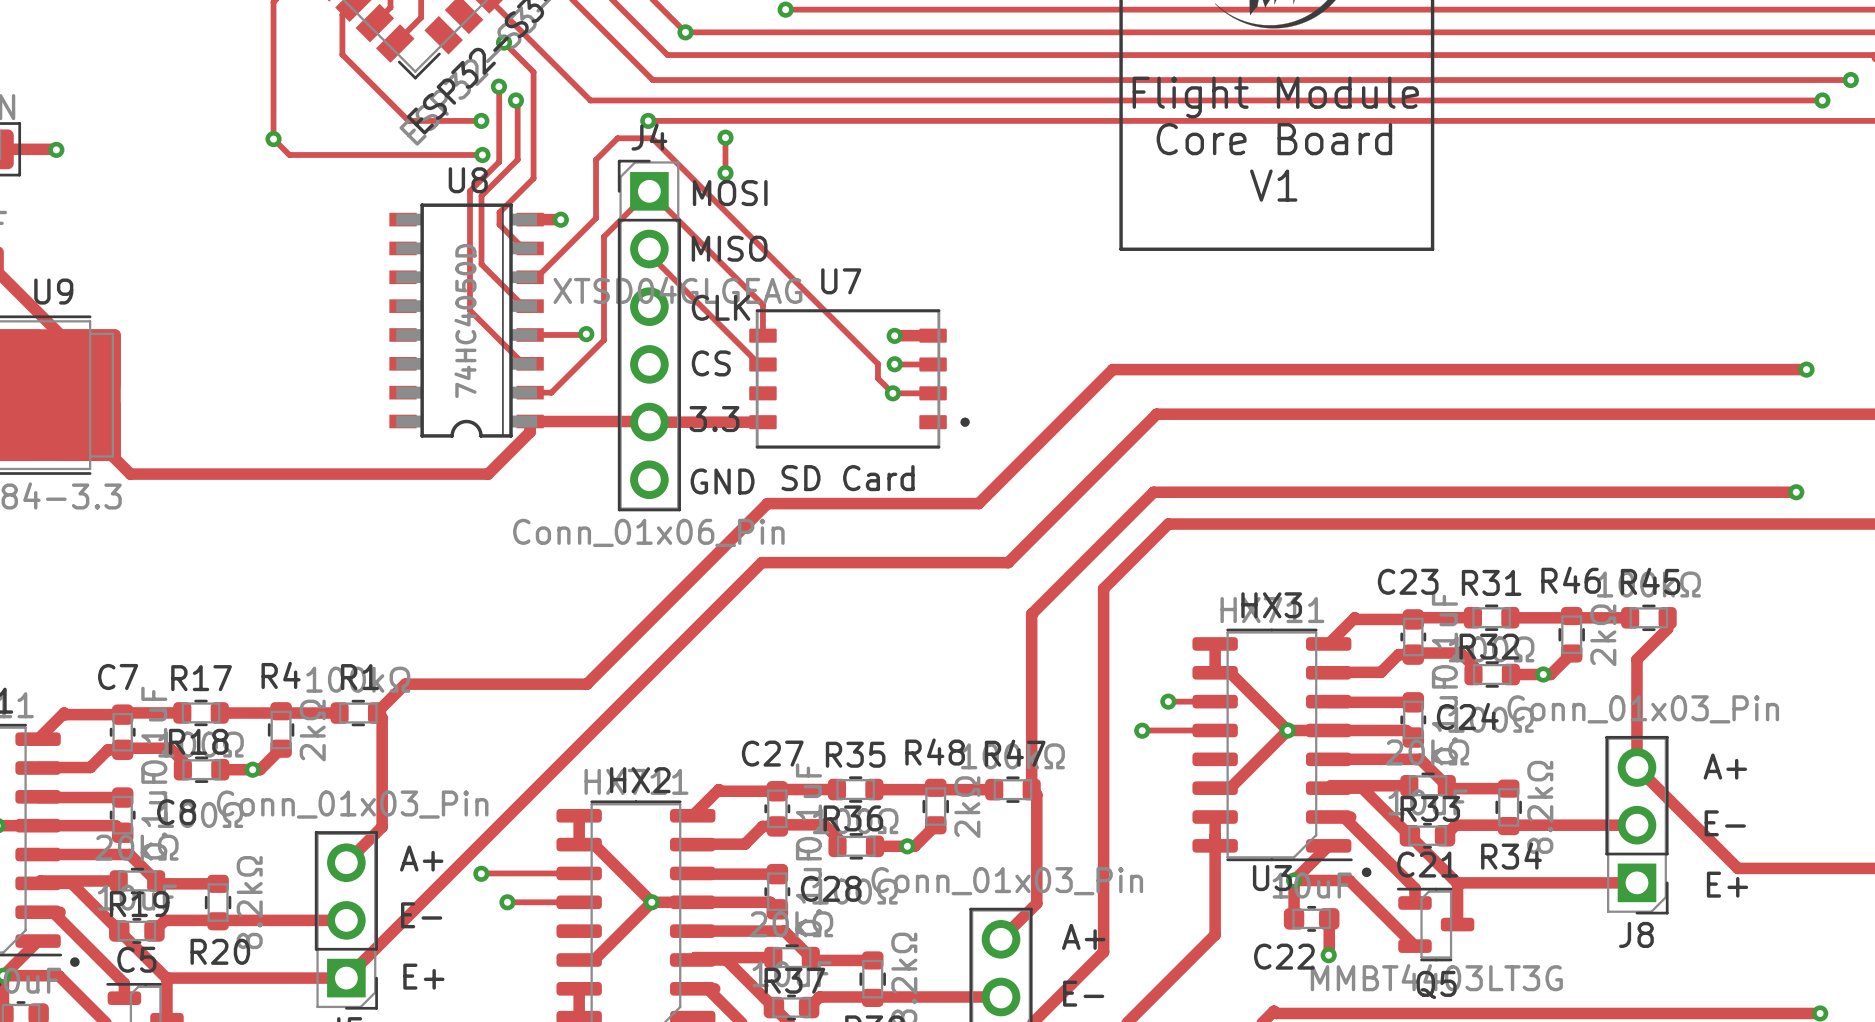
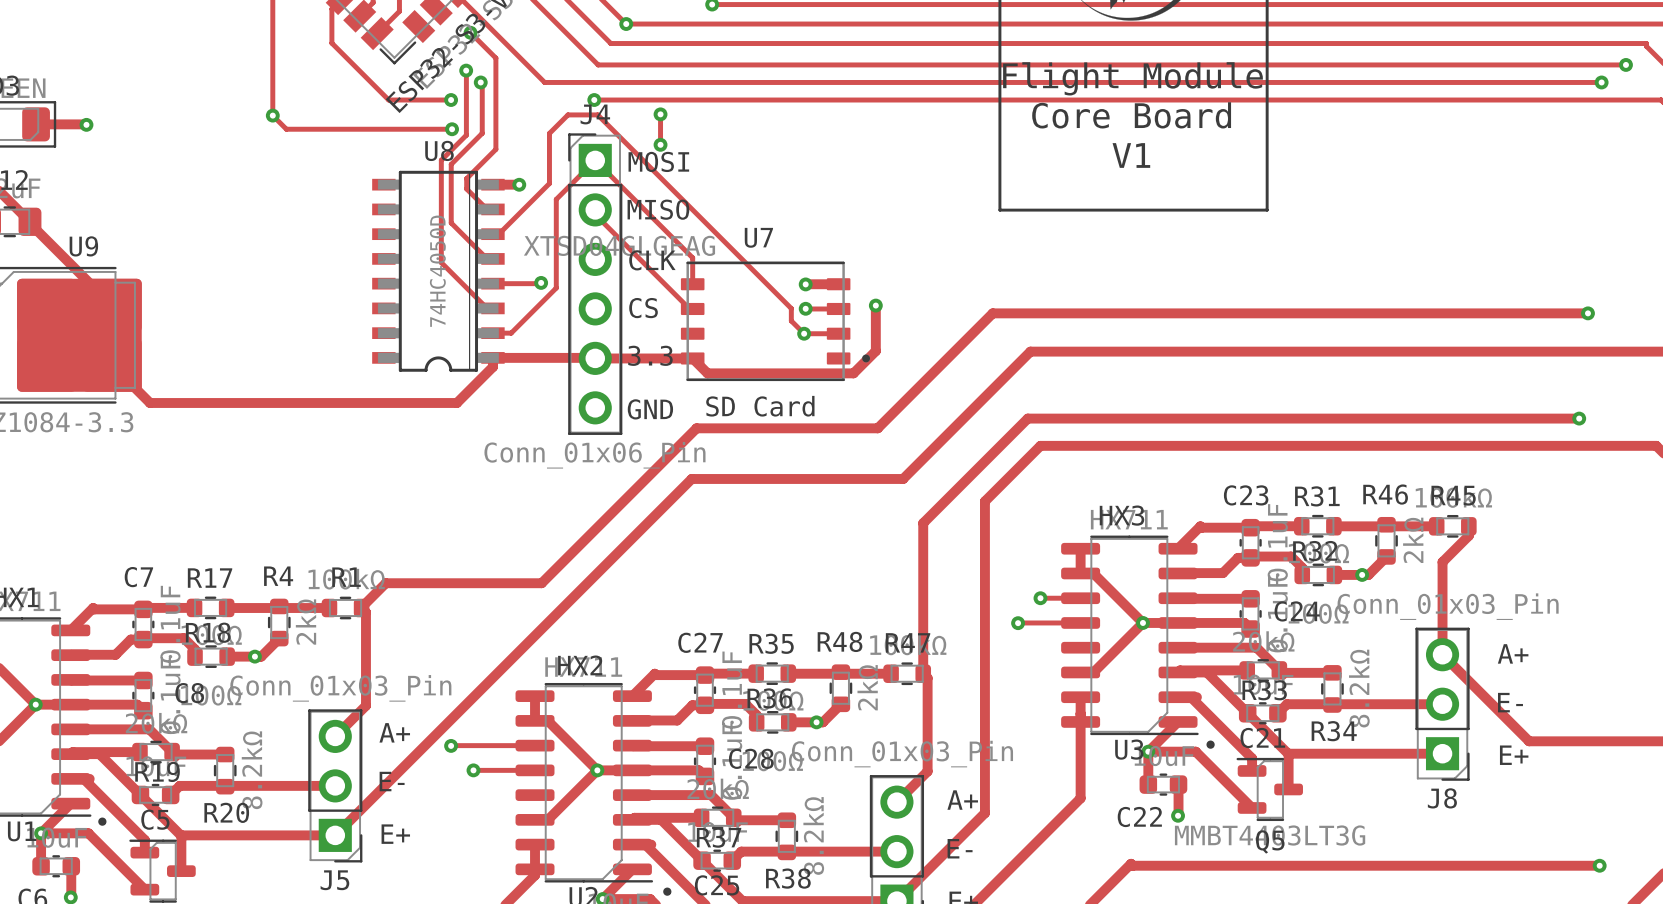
track: none -> (875, 305) (875, 351) (853, 373) (707, 373) (692, 358)
via: none -> (875, 305)

